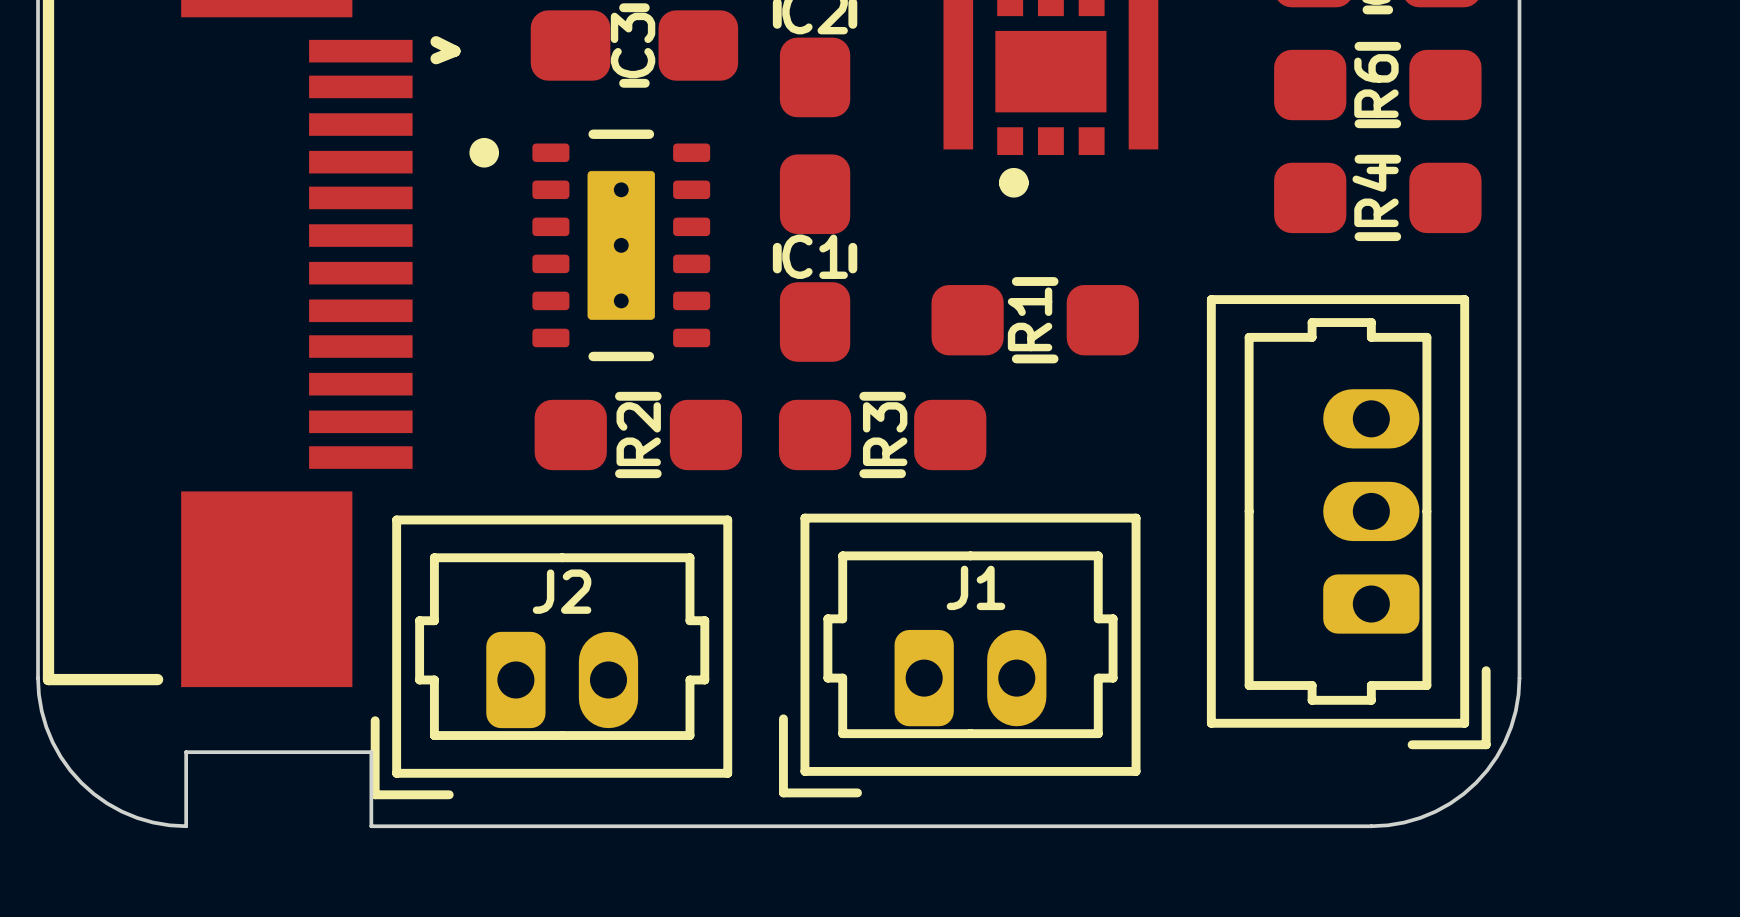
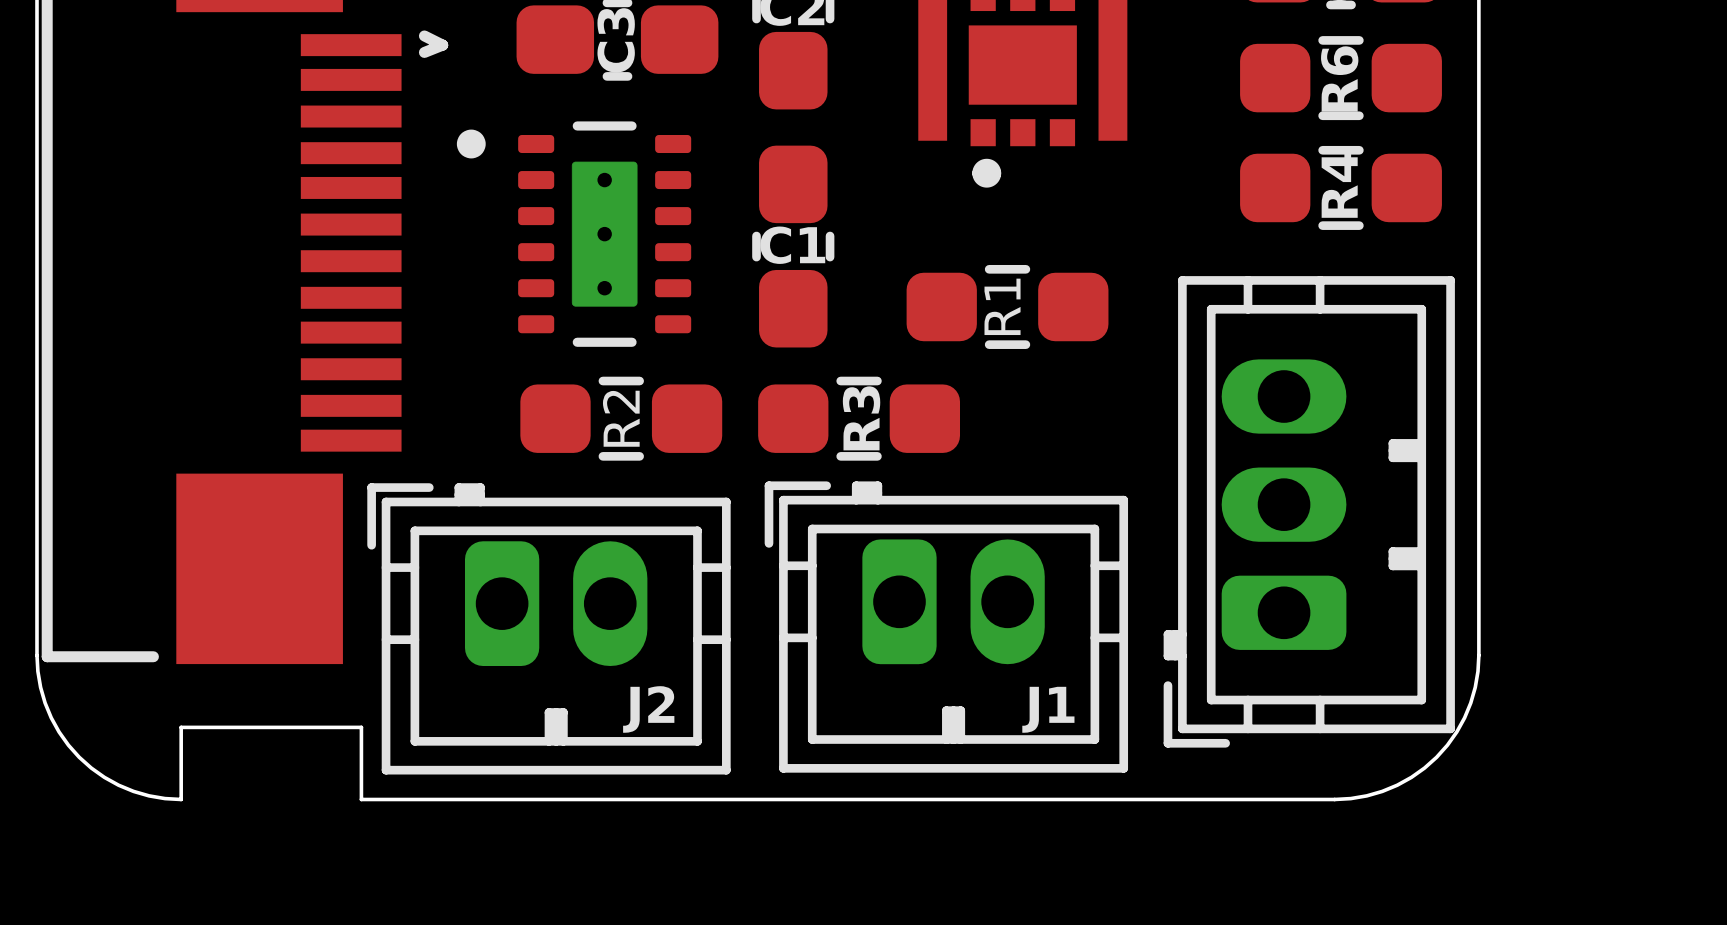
part footprint: [1206, 295, 1491, 750] -> [1163, 276, 1455, 748]
J1 footprint: [779, 513, 1141, 798] -> [764, 481, 1129, 773]
J2 footprint: [370, 515, 733, 800] -> [367, 483, 731, 775]
J1 name position: J1 (975, 587) -> J1 (1048, 709)
J2 name position: J2 (562, 591) -> J2 (648, 709)

